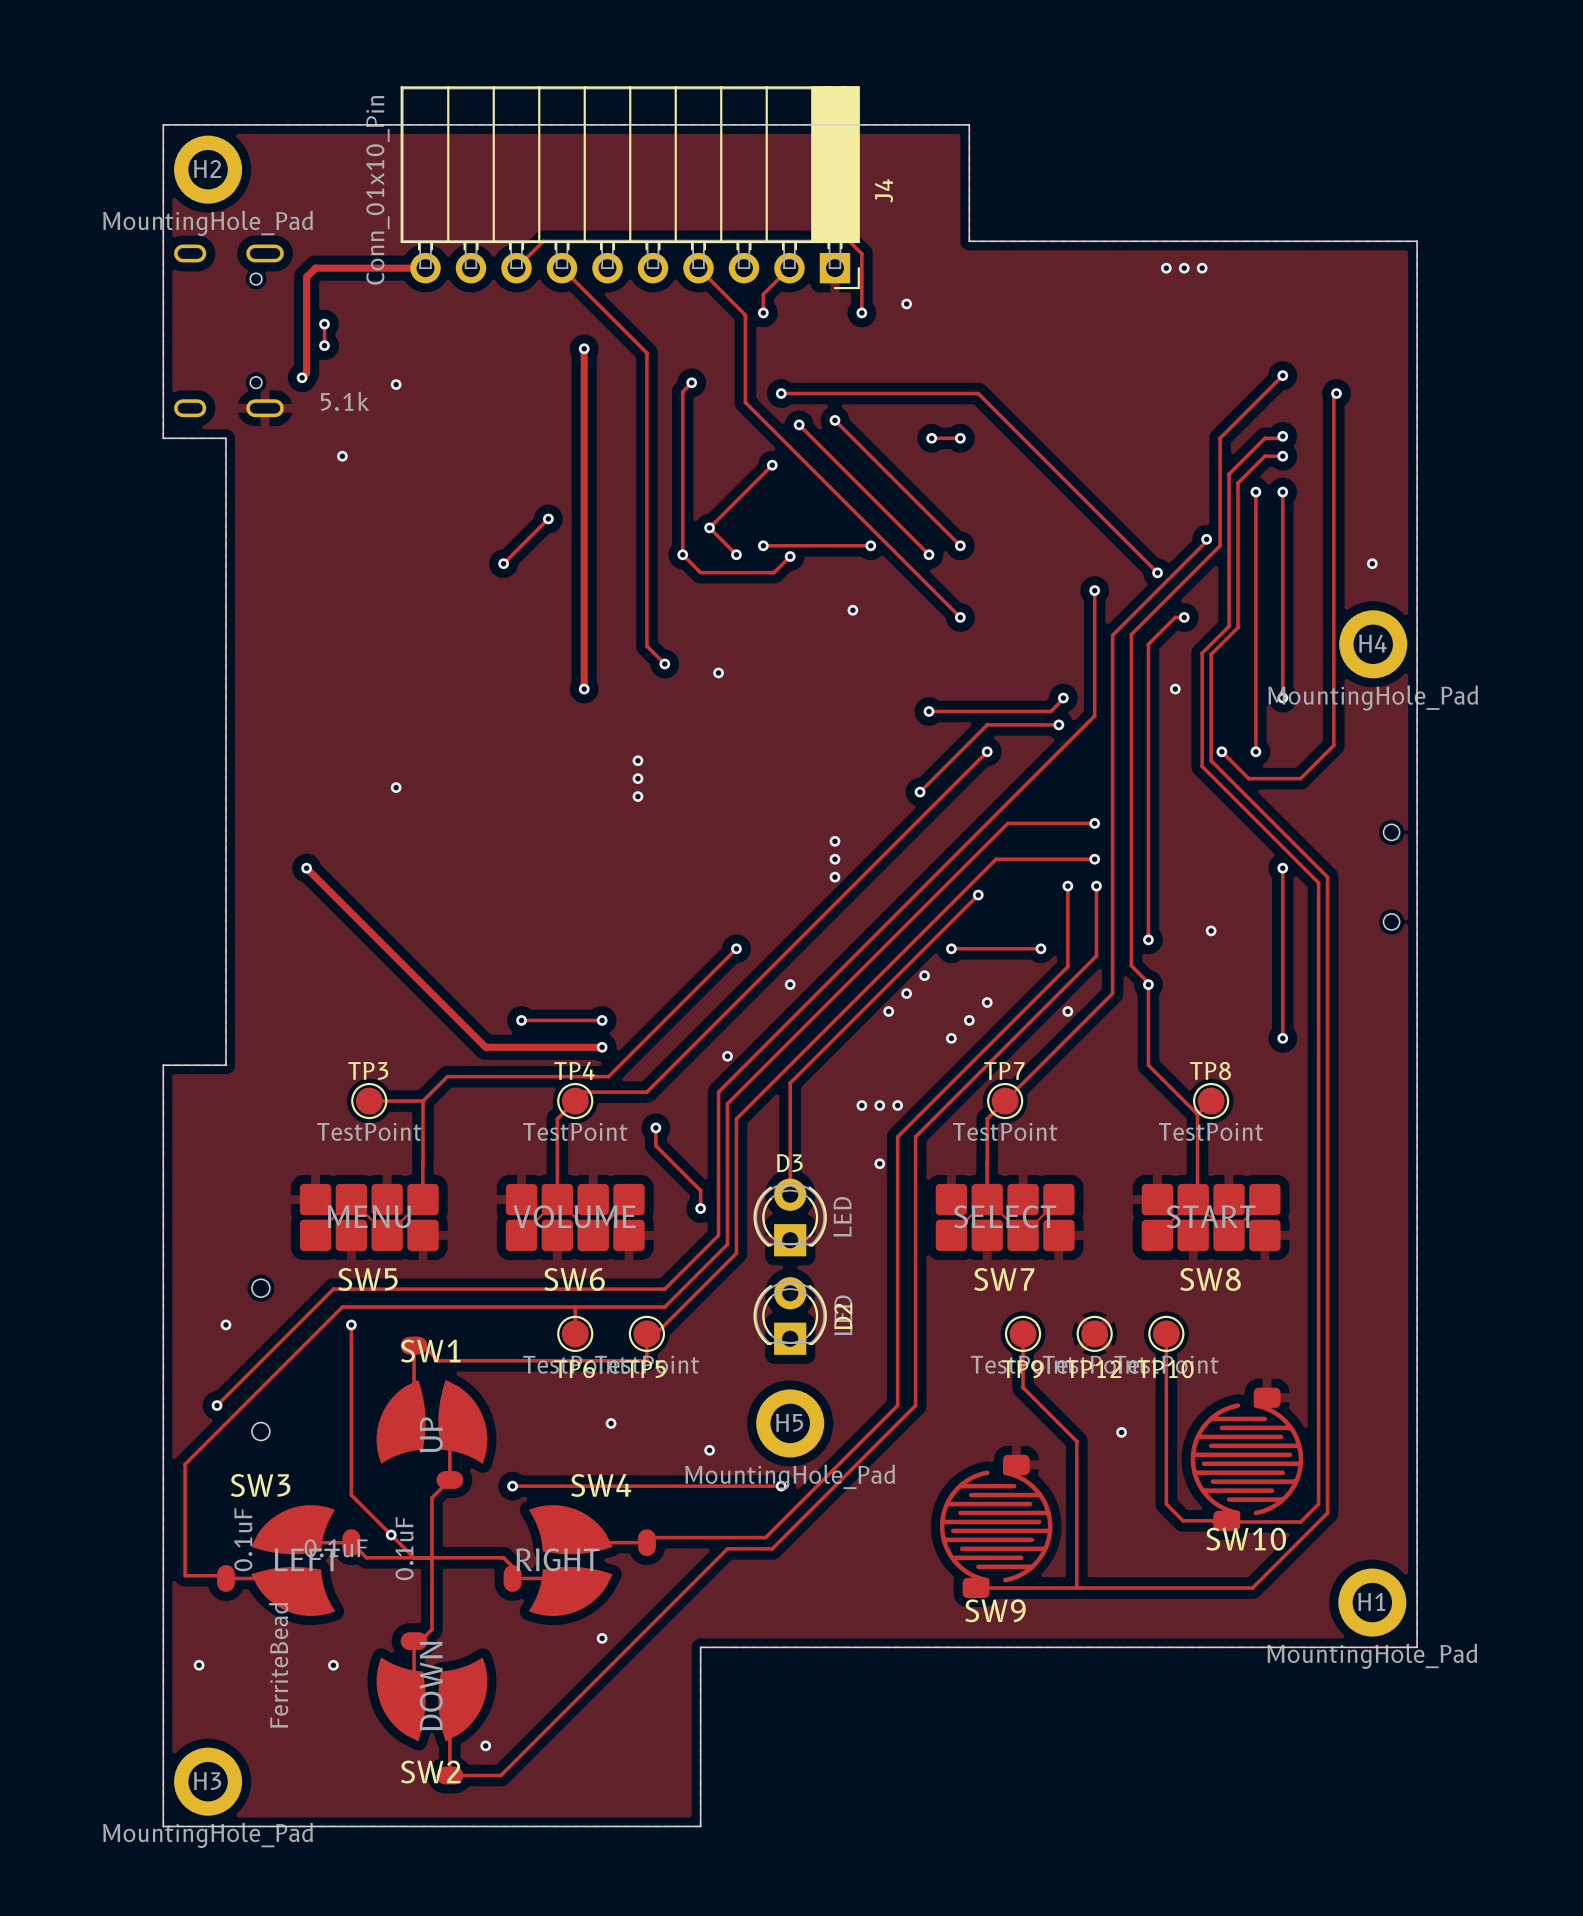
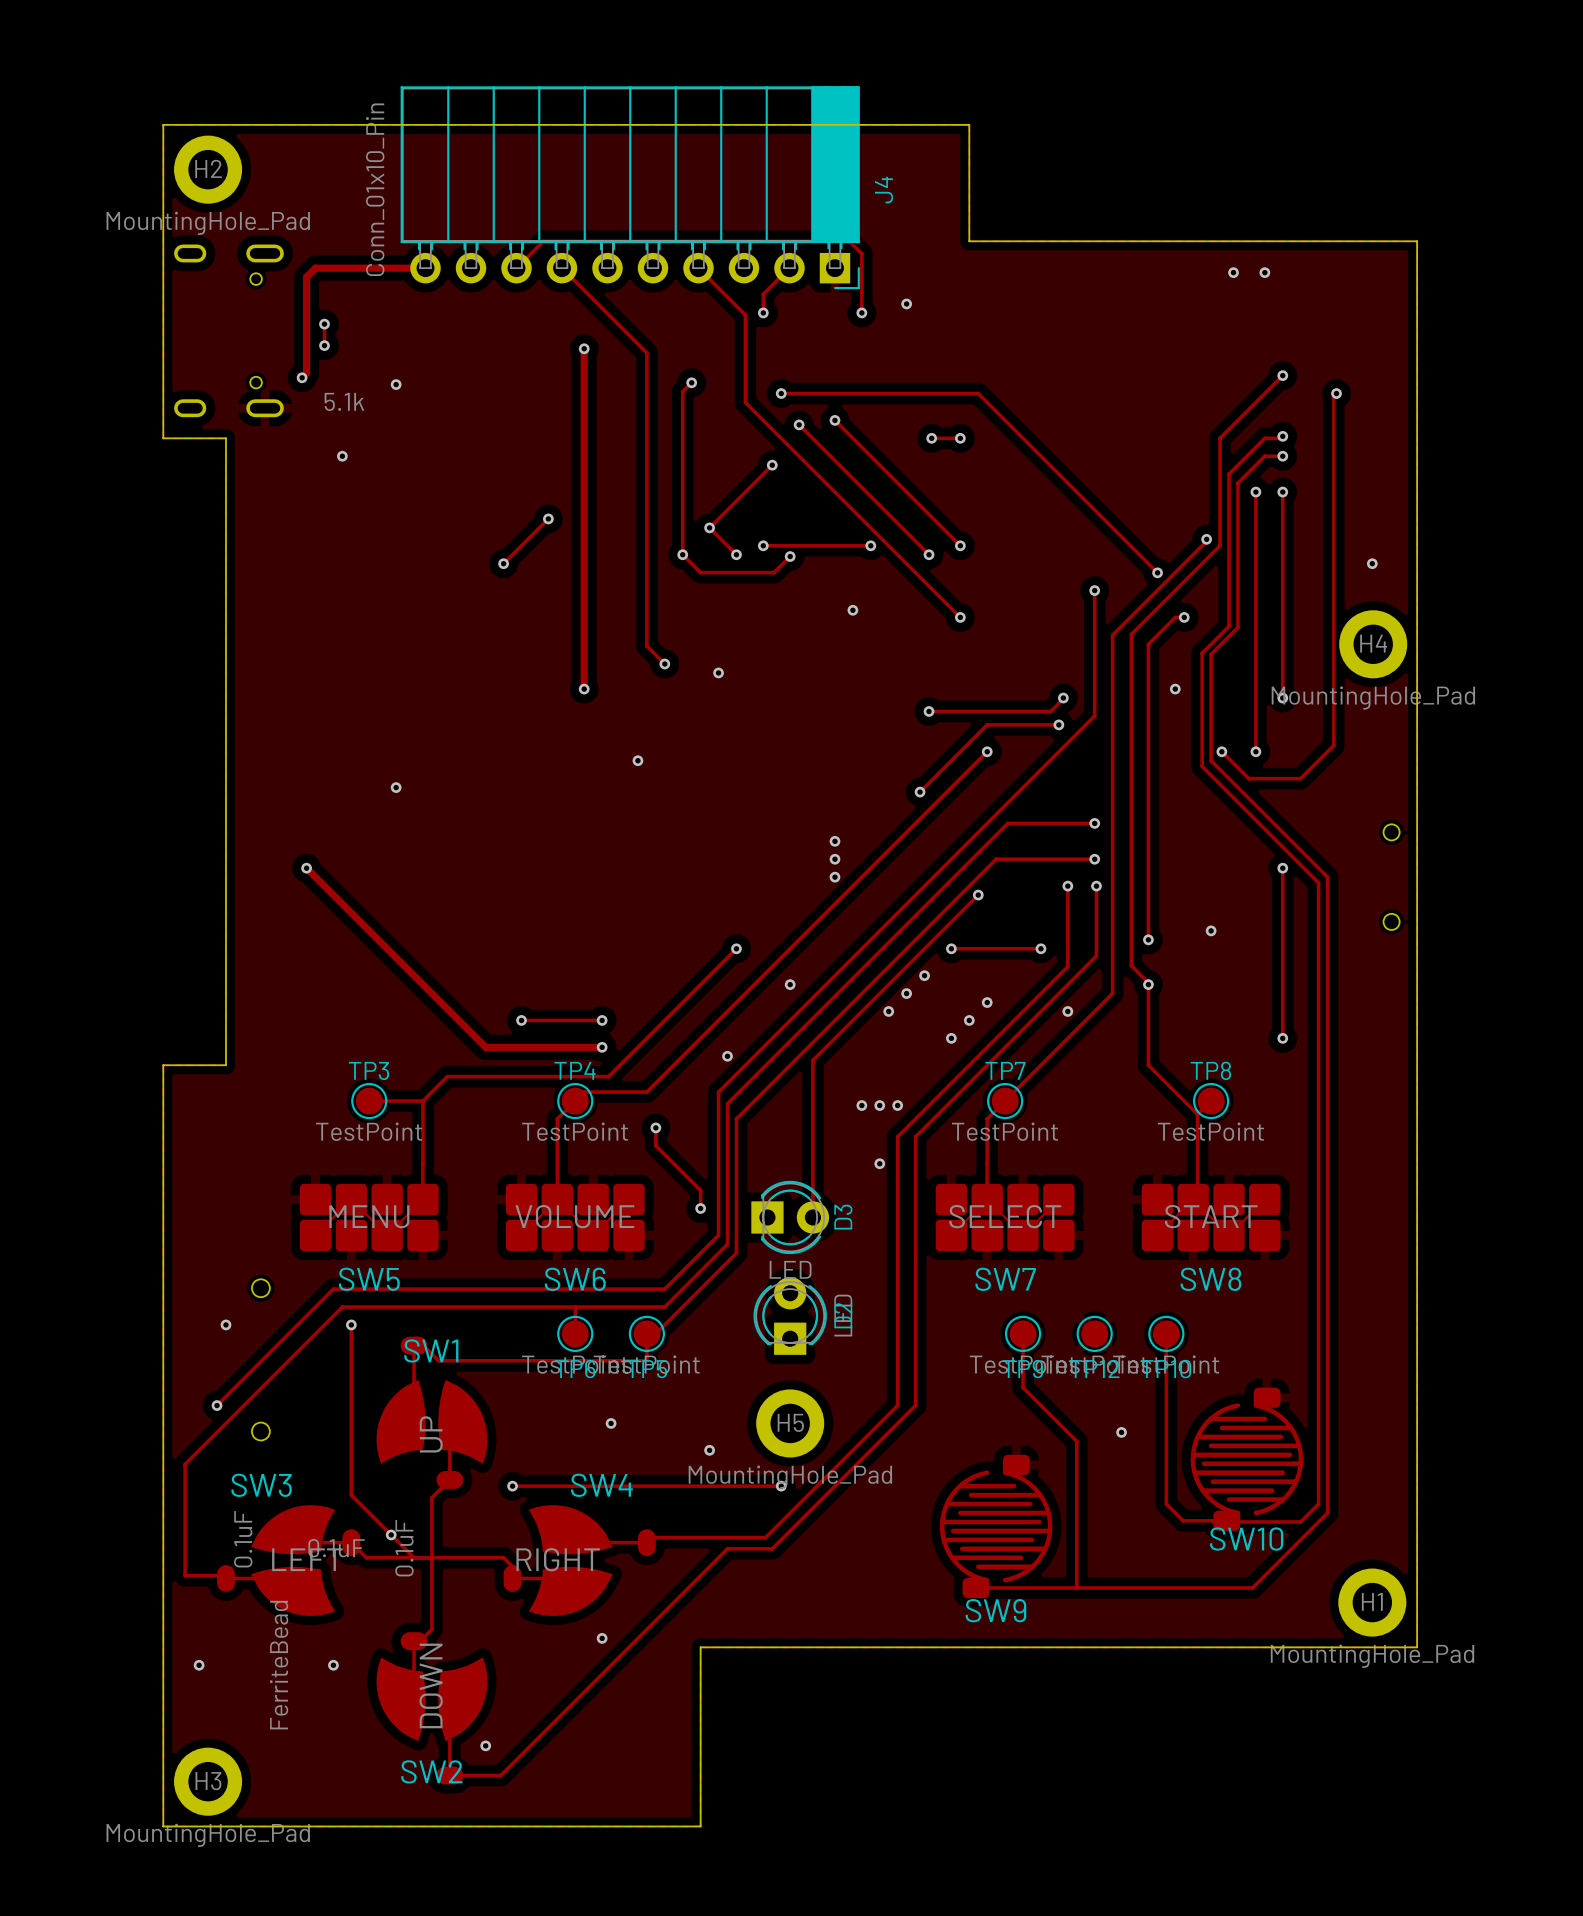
via: (1166, 268) -> none
via: (1184, 268) -> none
via: (1202, 268) -> none
via: none -> (1233, 272)
via: none -> (1264, 272)
via: (637, 778) -> none
via: (637, 796) -> none
track: (812, 1060) (790, 1083) (790, 1194) -> (812, 1060) (812, 1217)
D3 rotation: 0° (790, 1217) -> 90° clockwise (790, 1217)

